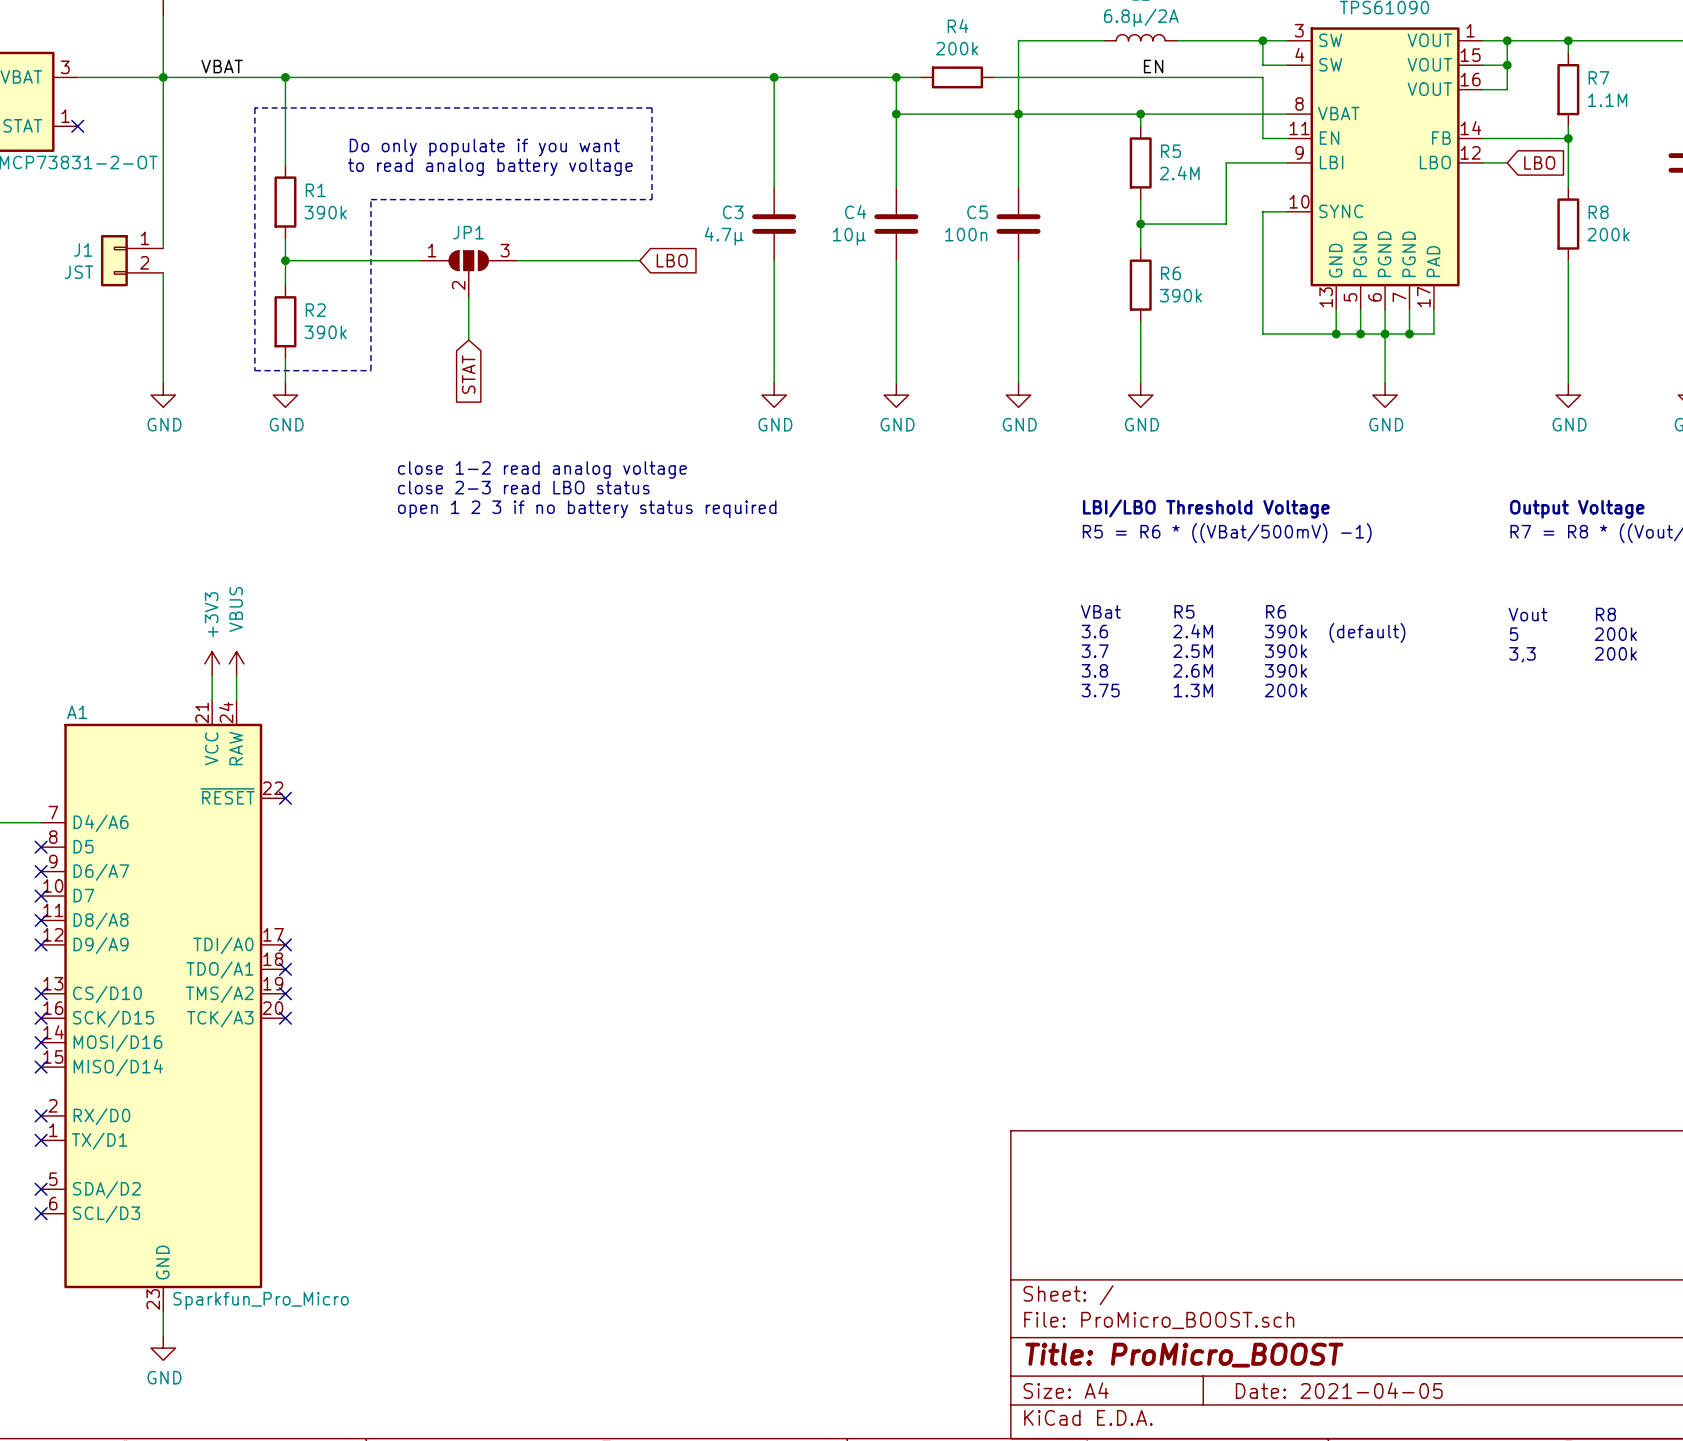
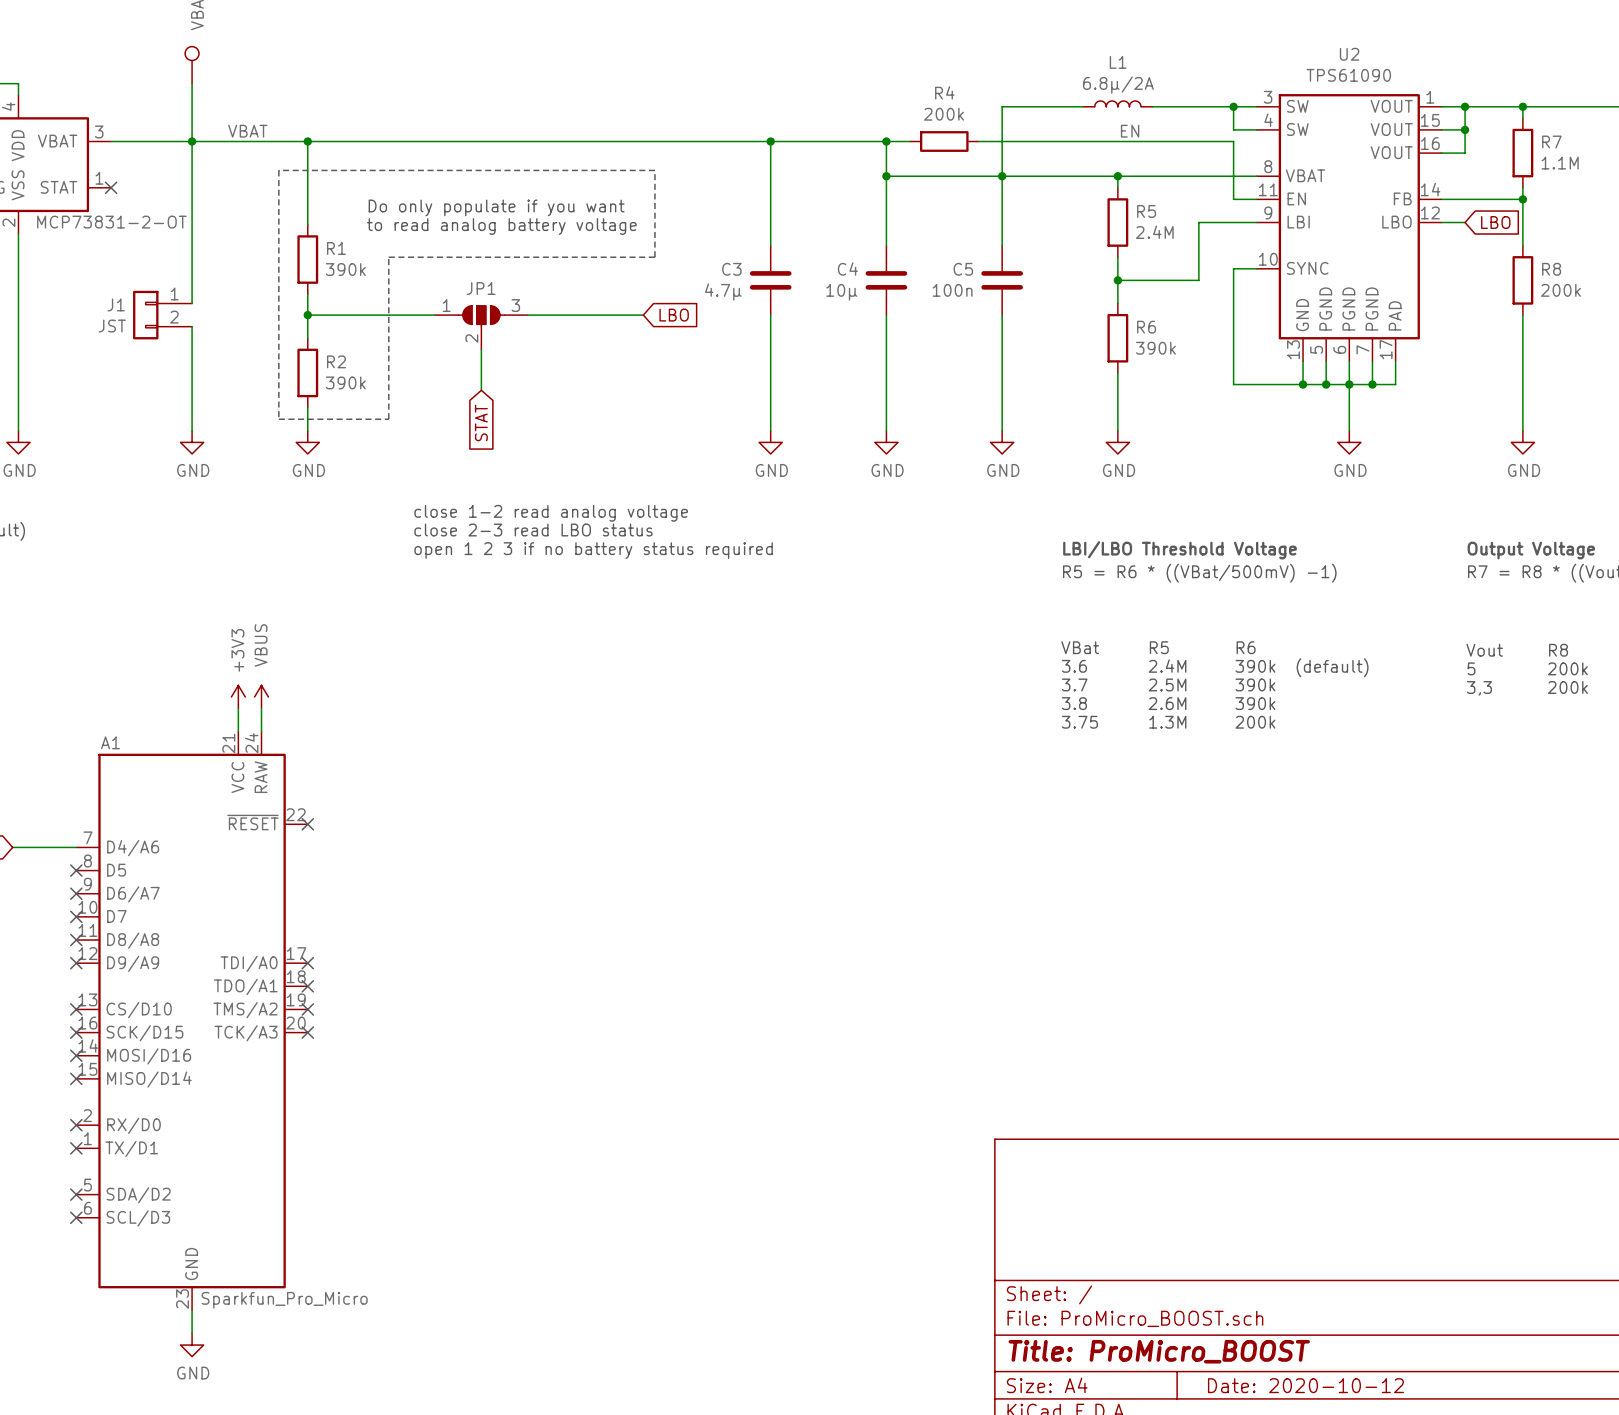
title block: Date: 2021-04-05 (1339, 1390) -> Date: 2020-10-12 (1305, 1385)

